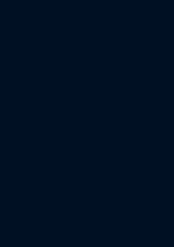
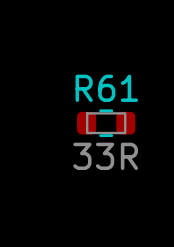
R61: none -> 33R (106, 123)

